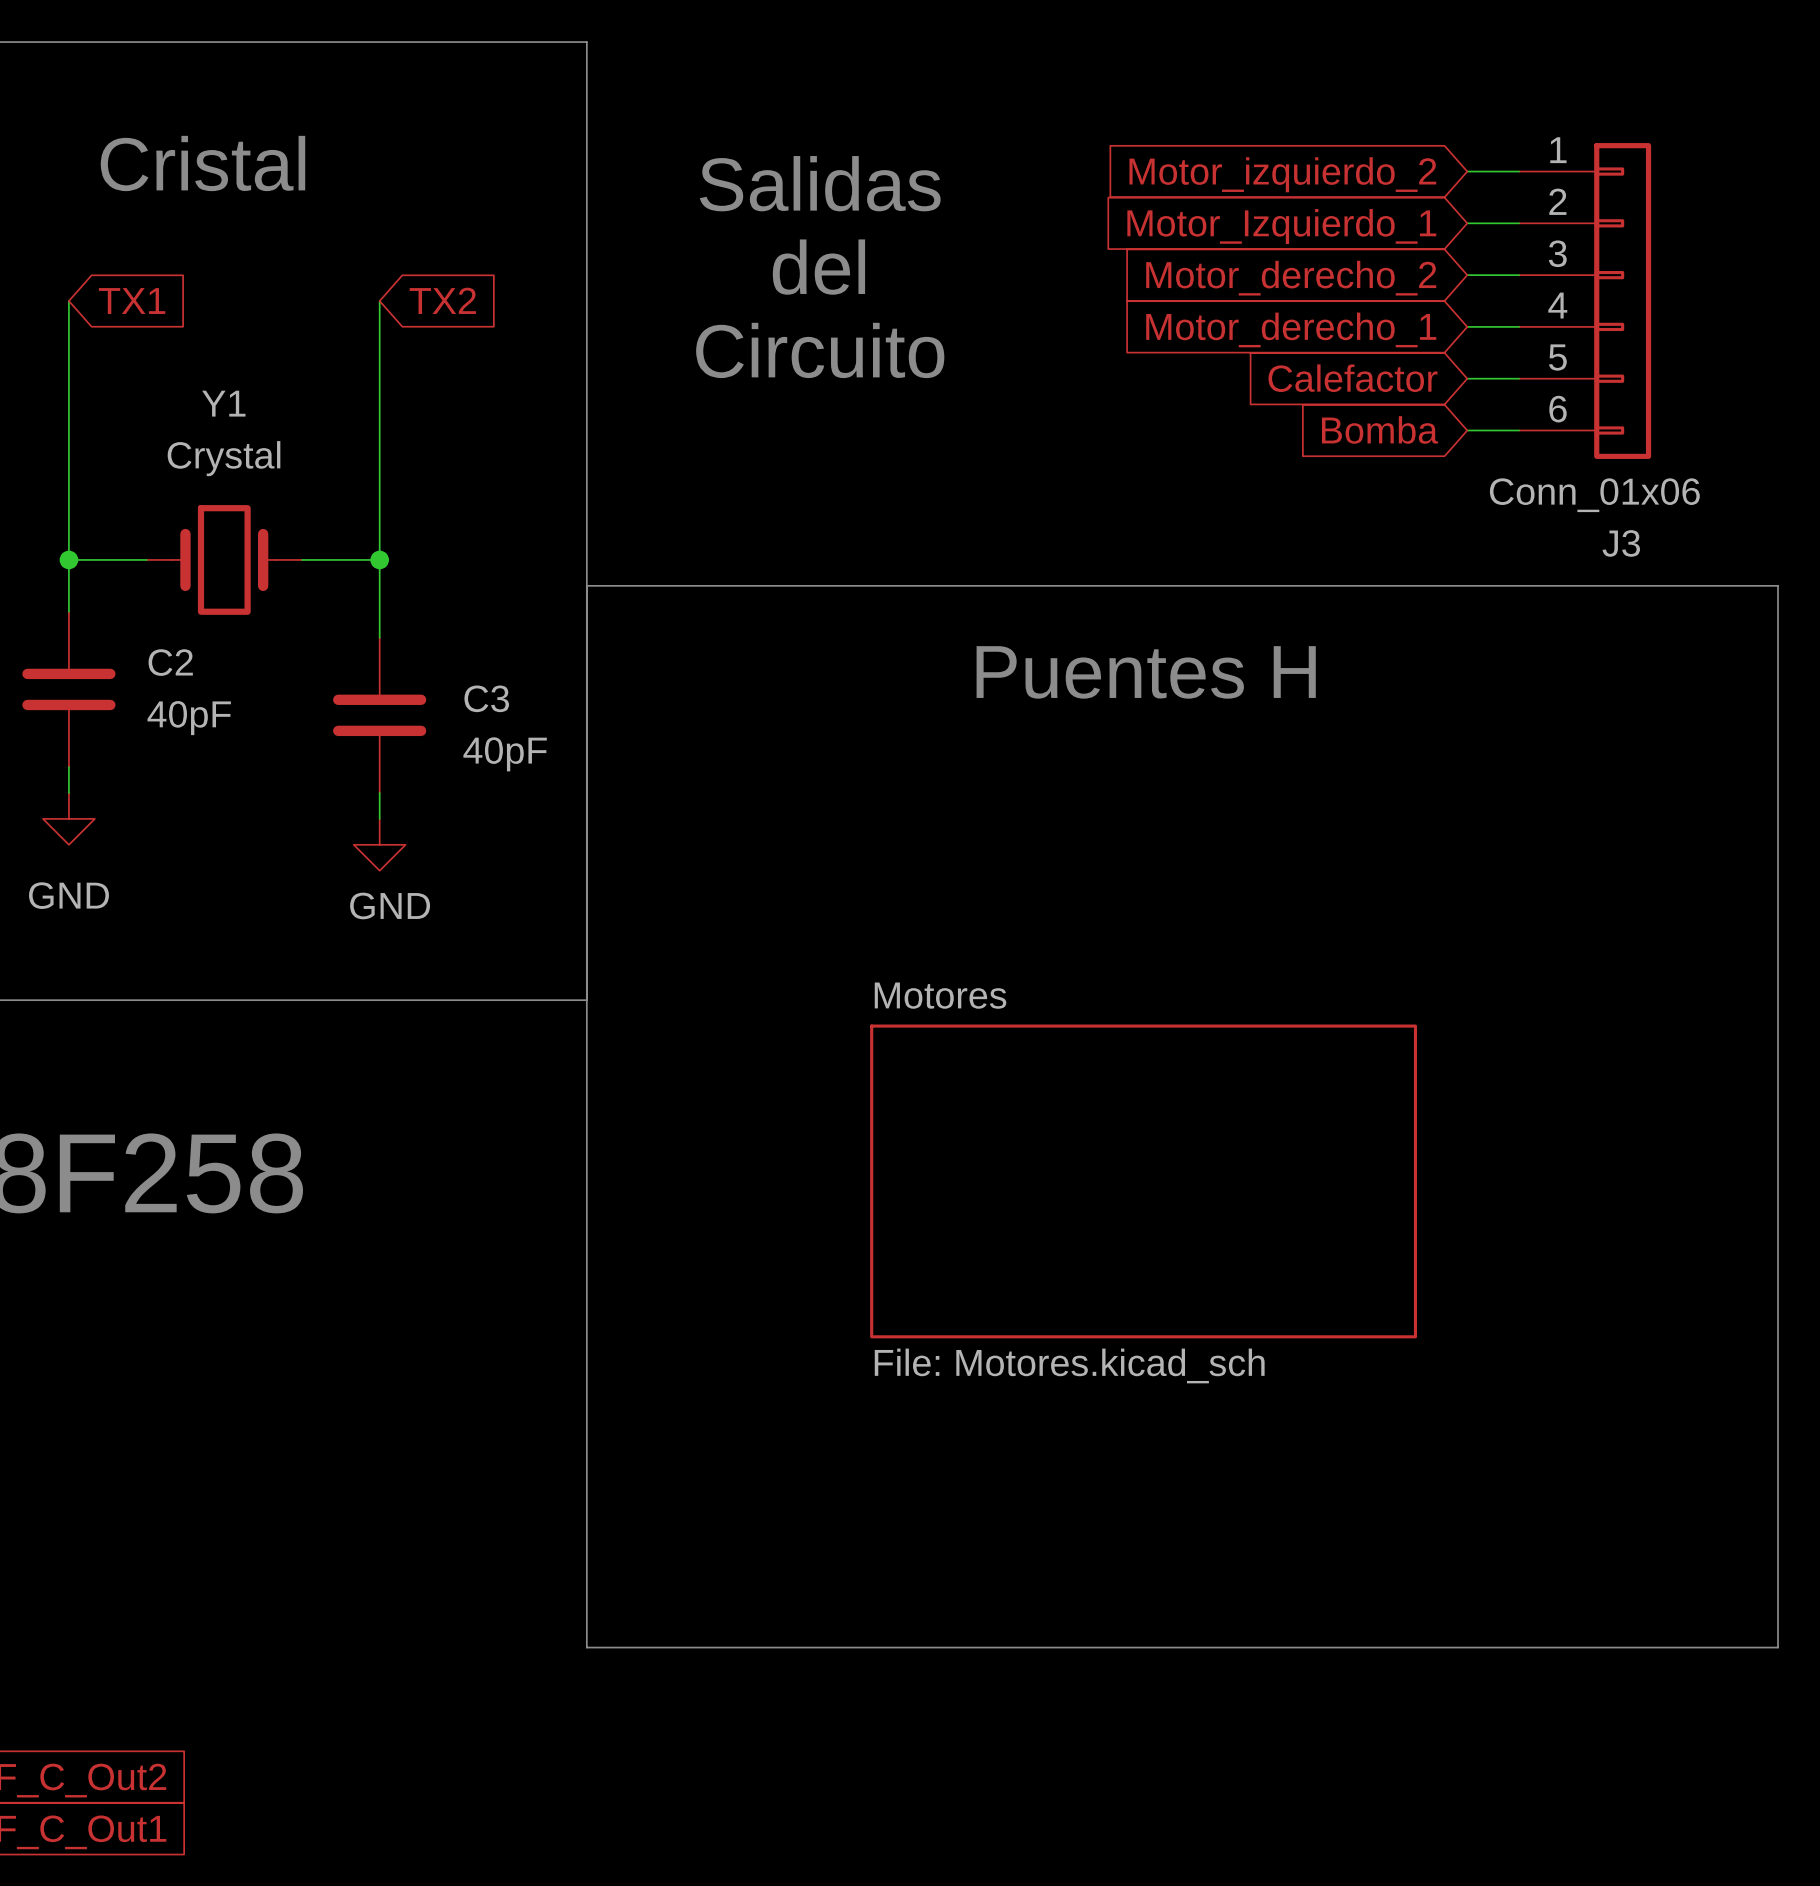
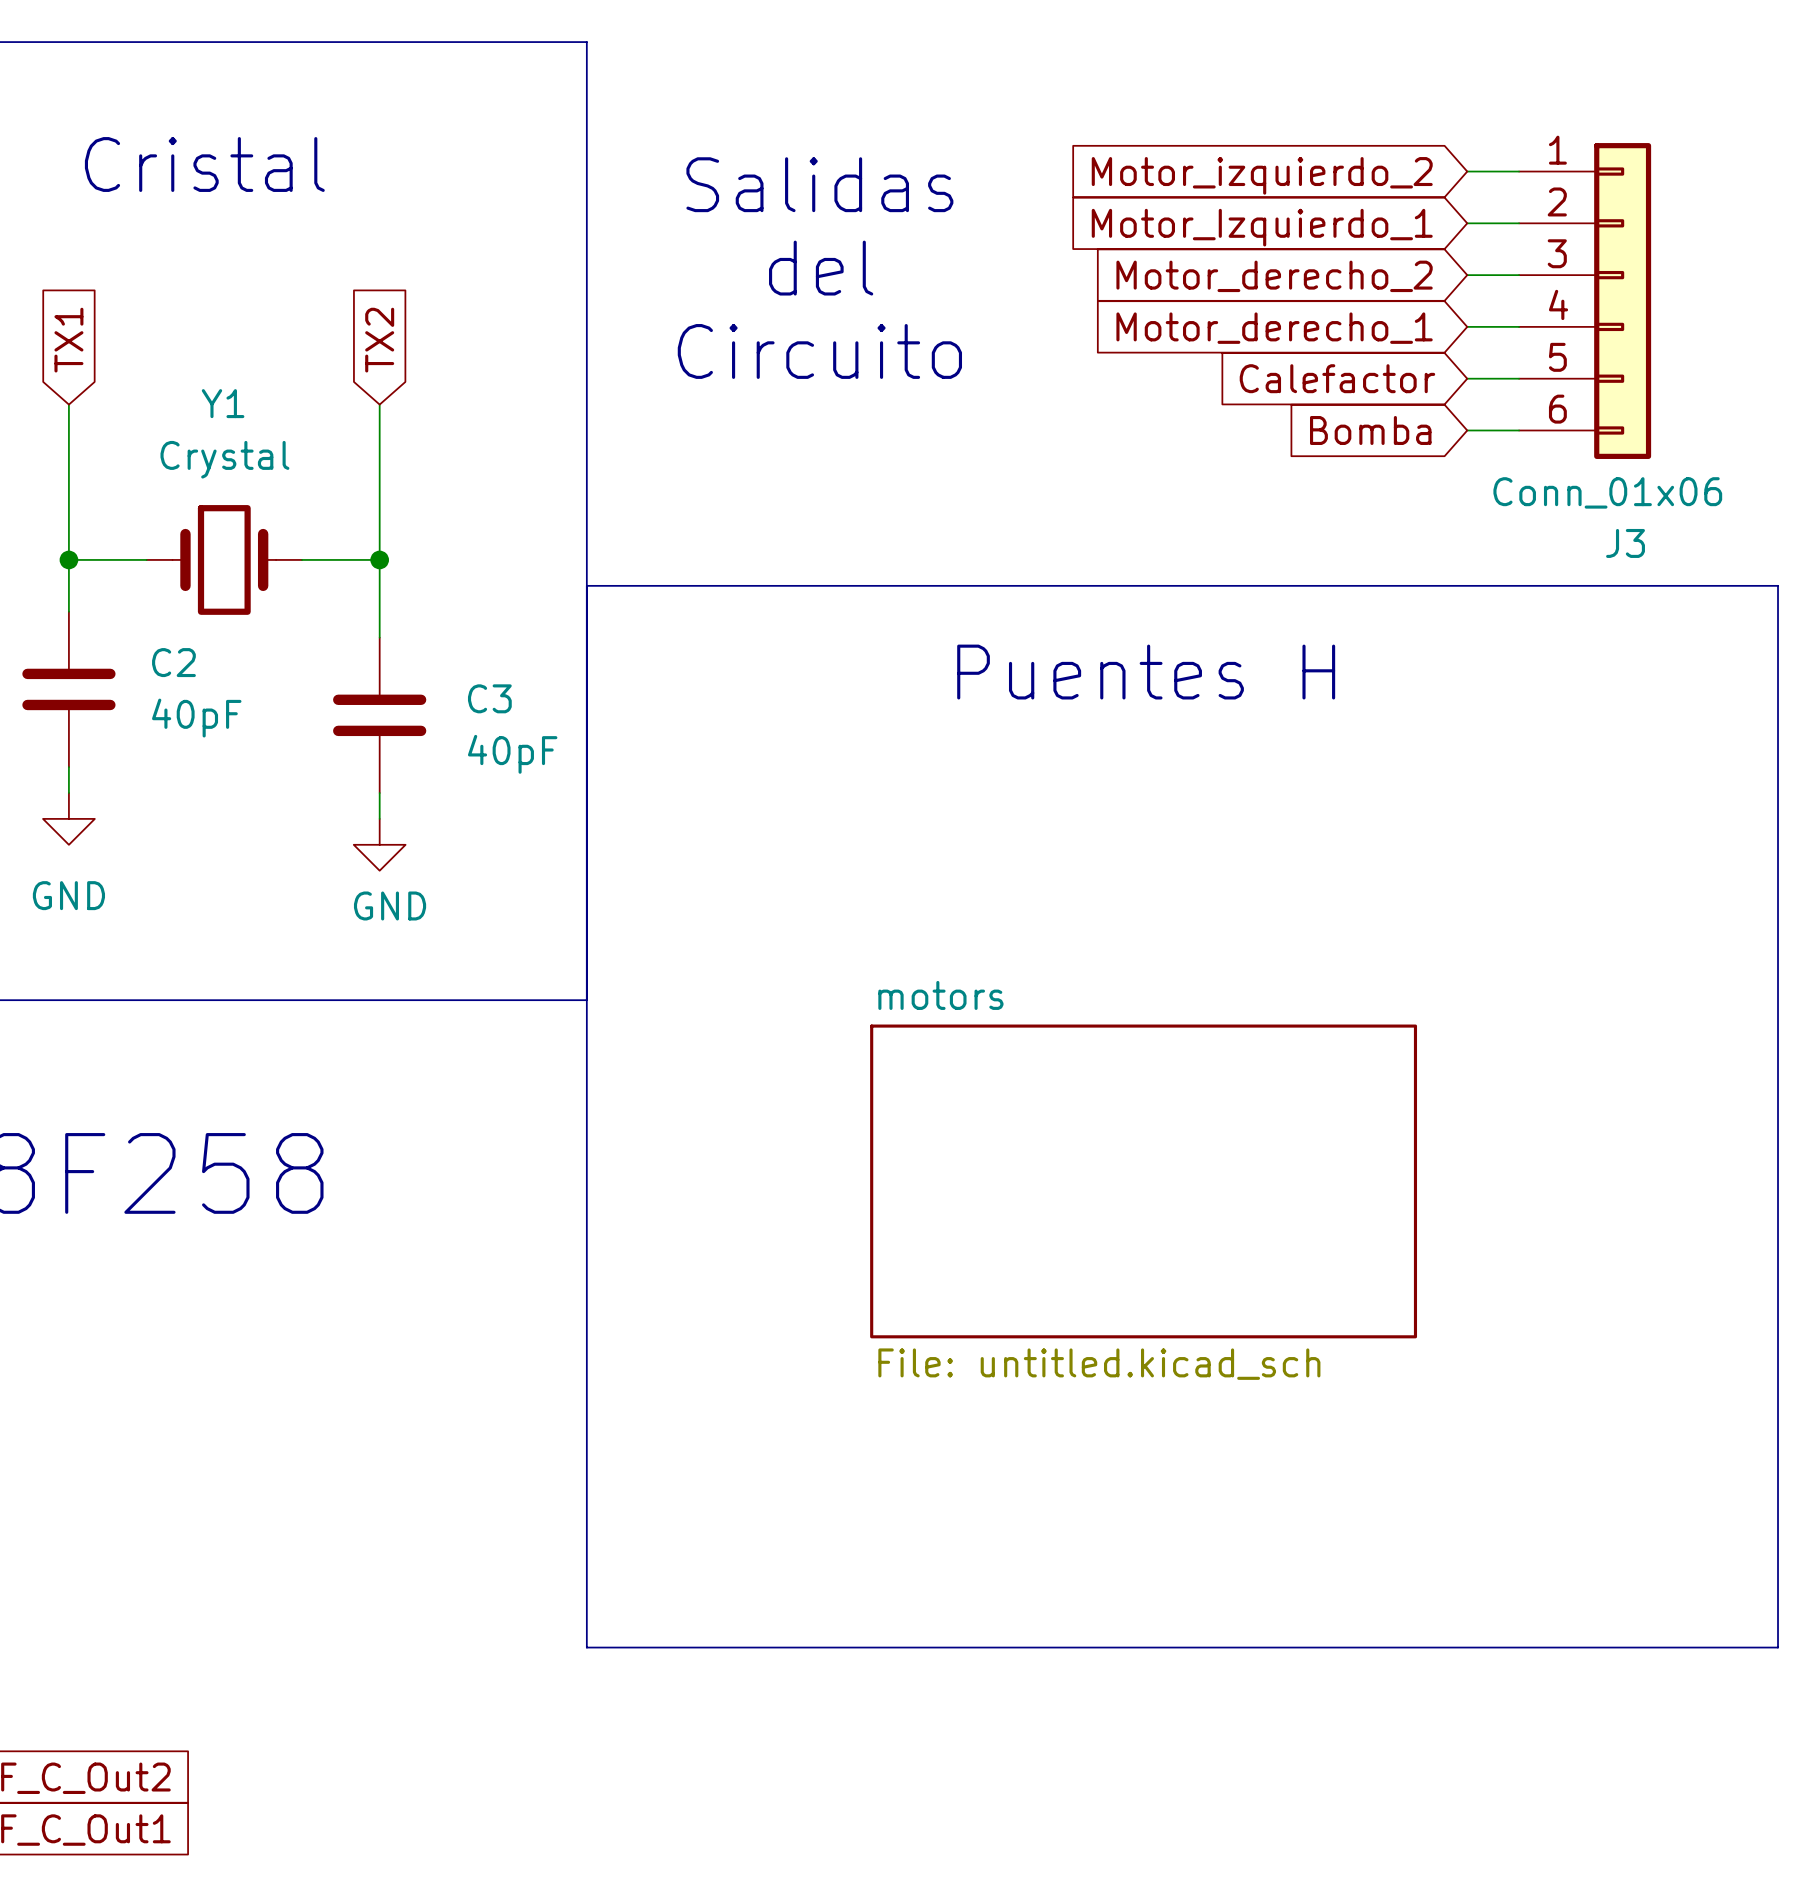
global label rotation: 0° (442, 300) -> 90° counterclockwise (379, 340)
wire: (68, 301) (68, 404) -> none
global label rotation: 0° (132, 301) -> 90° counterclockwise (68, 340)
wire: (379, 301) (379, 404) -> none
sheet Motores name: Motores (940, 995) -> motors (940, 995)
sheet Motores value: File: Motores.kicad_sch (1069, 1365) -> File: untitled.kicad_sch (1099, 1364)

